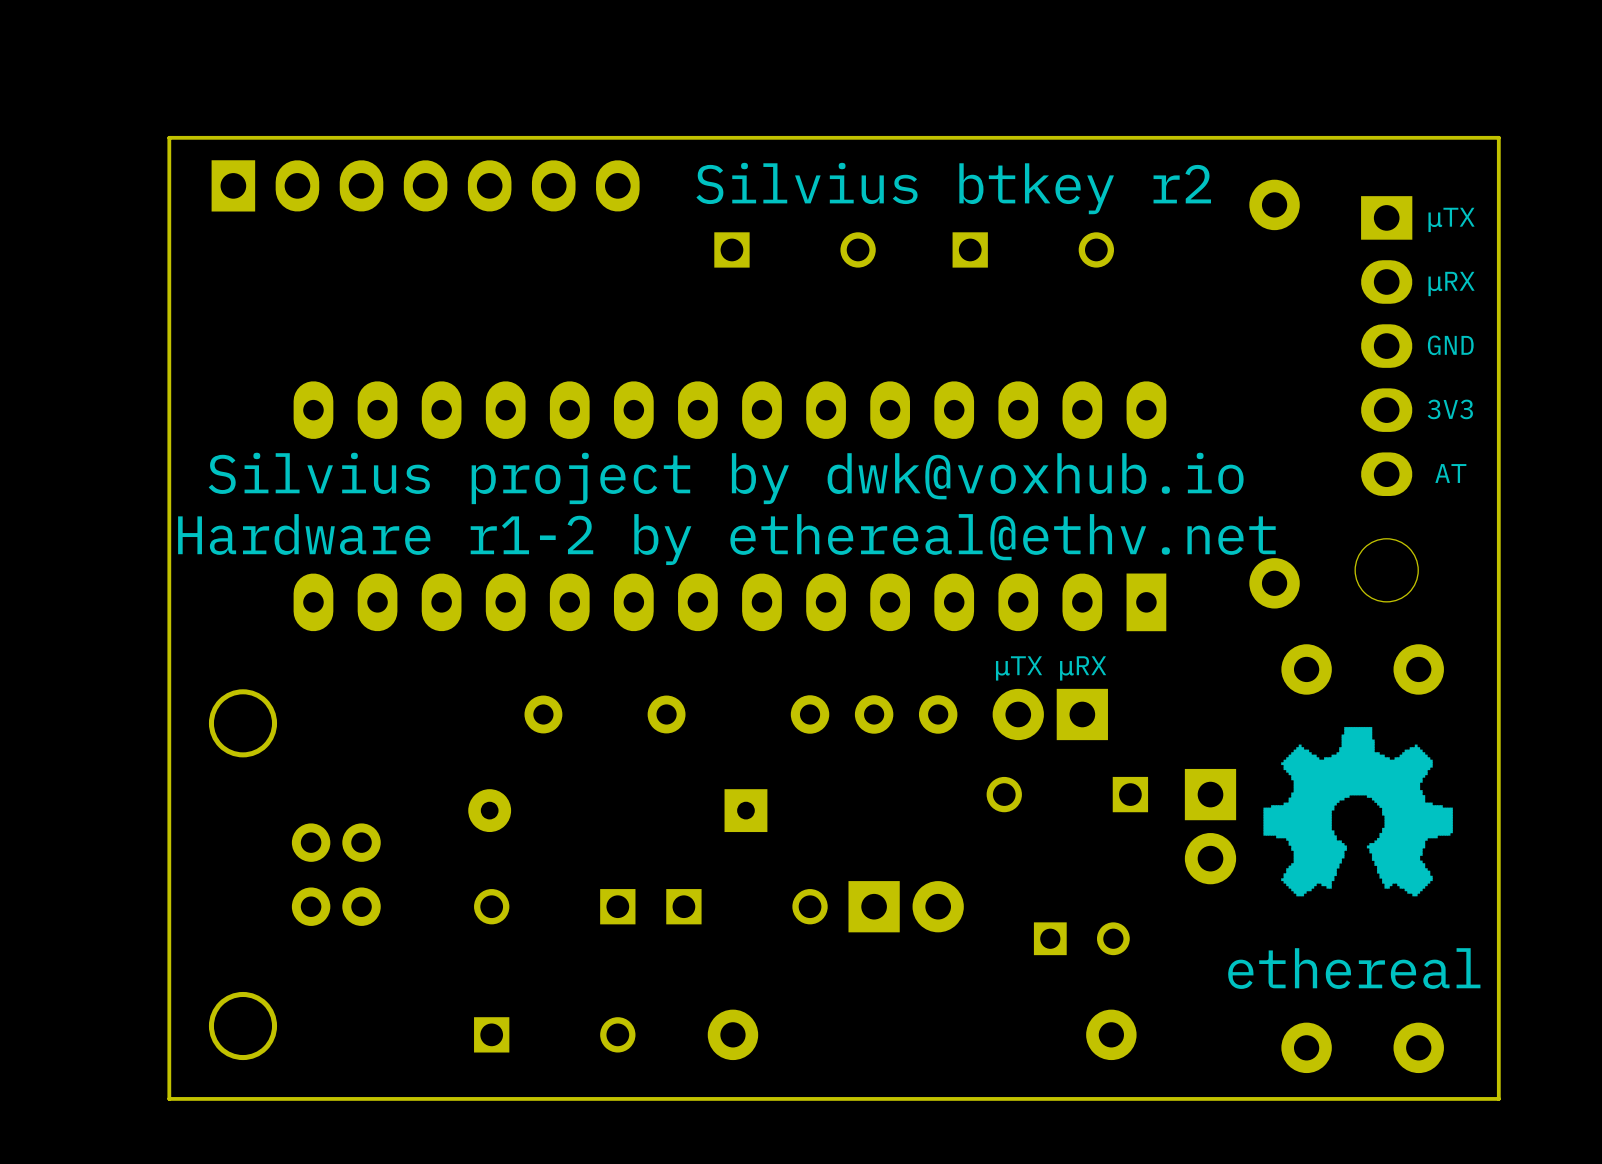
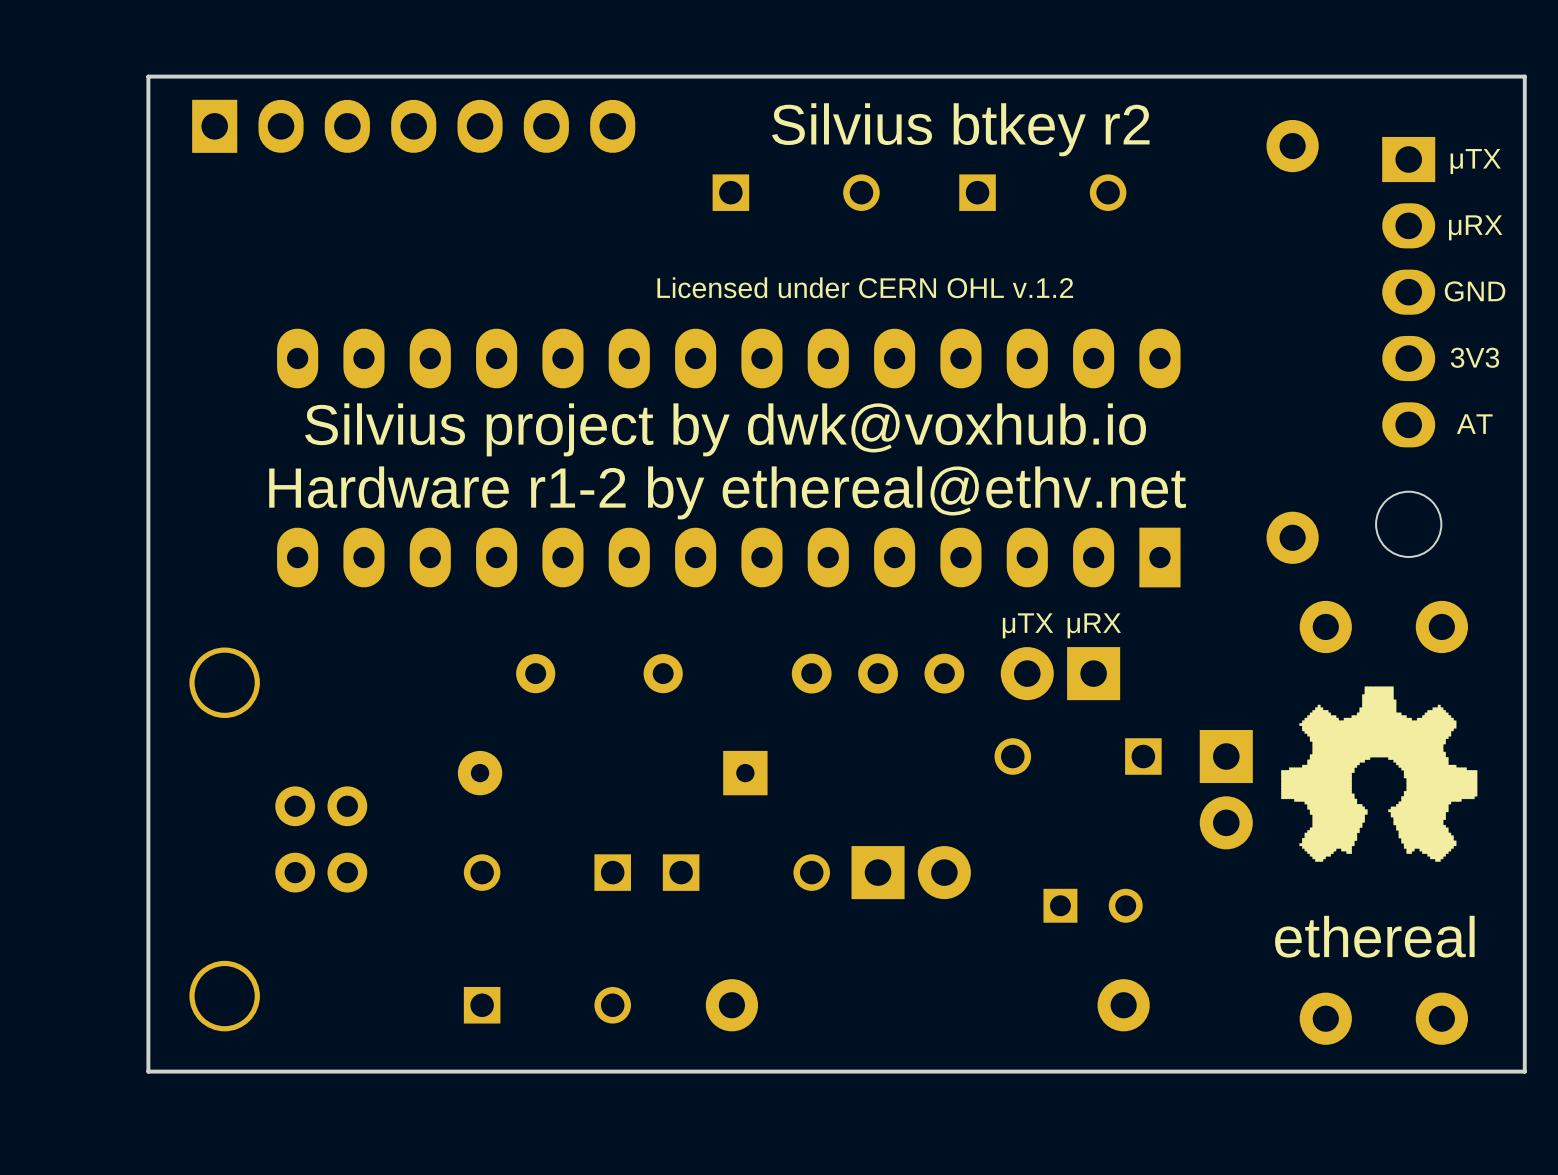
text: none -> Licensed under CERN OHL v.1.2 (865, 287)

